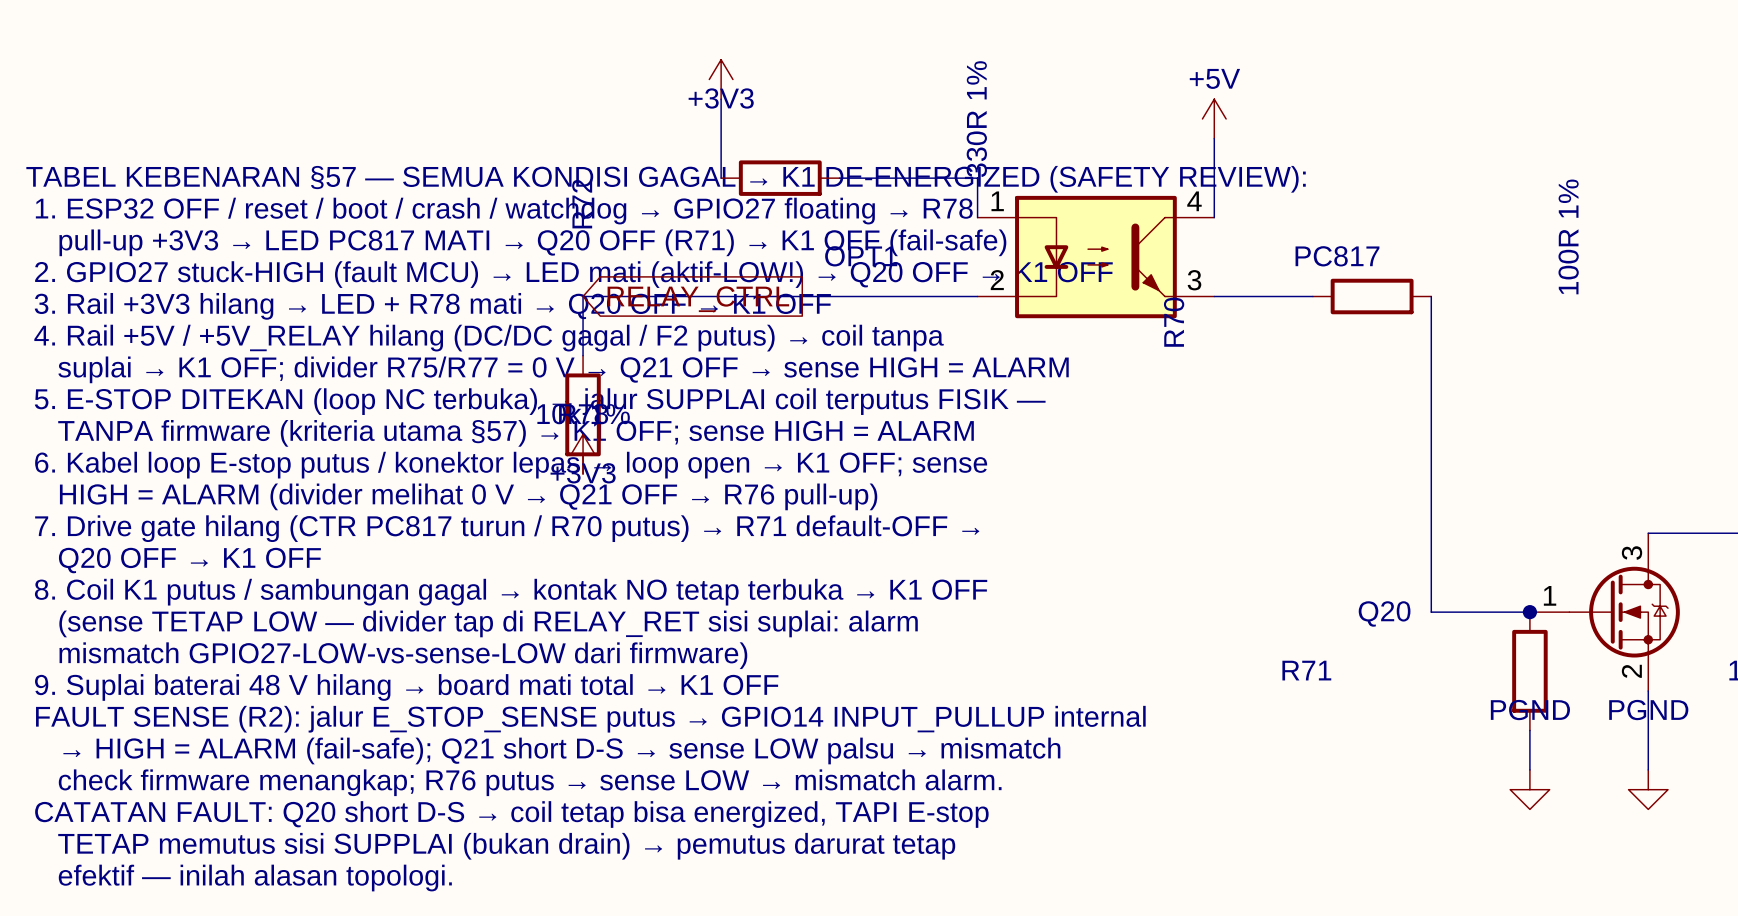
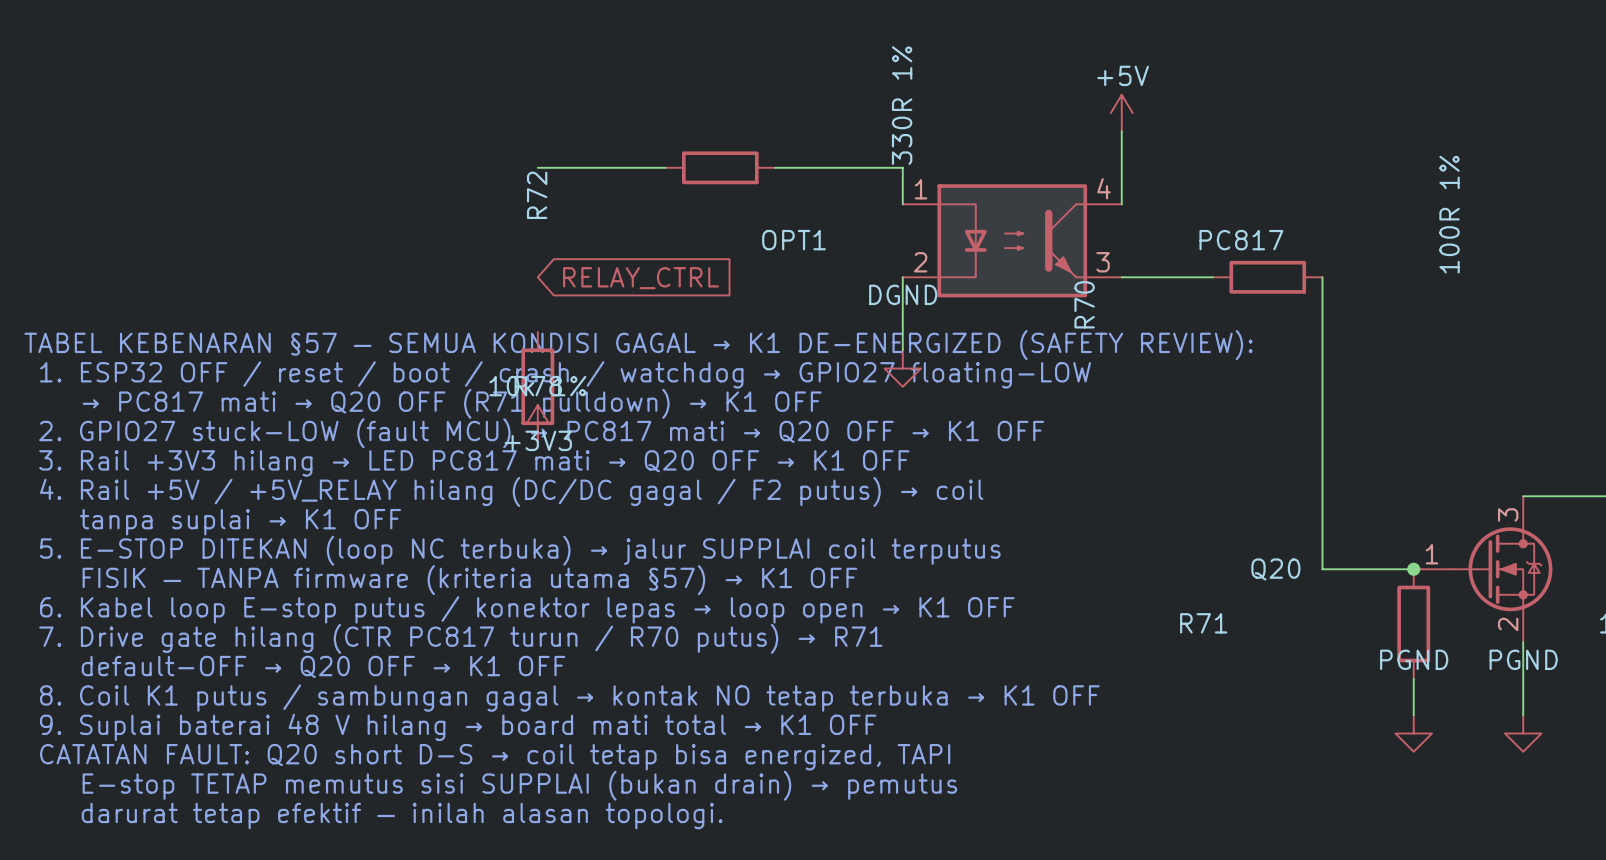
power symbol: +3V3 (721, 79) -> none
wire: (721, 99) (721, 178) -> (537, 167) (665, 167)
text: TABEL KEBENARAN §57 — SEMUA KONDISI GAGAL → K1 DE-ENERGIZED (SAFETY REVIEW): (666, 179) -> none
text: 1. ESP32 OFF / reset / boot / crash / watchdog → GPIO27 floating → R78 (504, 211) -> none
text: pull-up +3V3 → LED PC817 MATI → Q20 OFF (R71) → K1 OFF (fail-safe) (532, 242) -> none
text: 2. GPIO27 stuck-HIGH (fault MCU) → LED mati (aktif-LOW!) → Q20 OFF → K1 OFF (573, 274) -> none
wire: (977, 296) (583, 296) (583, 355) -> (902, 277) (902, 350)
text: 3. Rail +3V3 hilang → LED + R78 mati → Q20 OFF → K1 OFF (432, 306) -> none
text: 4. Rail +5V / +5V_RELAY hilang (DC/DC gagal / F2 putus) → coil tanpa (489, 338) -> none
text: suplai → K1 OFF; divider R75/R77 = 0 V → Q21 OFF → sense HIGH = ALARM (563, 369) -> TABEL KEBENARAN §57 — SEMUA KONDISI GAGAL → K1 DE-ENERGIZED (SAFETY REVIEW): (638, 345)
power symbol: none -> DGND (902, 368)
text: 5. E-STOP DITEKAN (loop NC terbuka) → jalur SUPPLAI coil terputus FISIK — (540, 401) -> 1. ESP32 OFF / reset / boot / crash / watchdog → GPIO27 floating-LOW (565, 374)
text: TANPA firmware (kriteria utama §57) → K1 OFF; sense HIGH = ALARM (516, 433) -> → PC817 mati → Q20 OFF (R71 pulldown) → K1 OFF (452, 403)
text: 6. Kabel loop E-stop putus / konektor lepas → loop open → K1 OFF; sense (511, 465) -> 2. GPIO27 stuck-LOW (fault MCU) → PC817 mati → Q20 OFF → K1 OFF (541, 433)
text: HIGH = ALARM (divider melihat 0 V → Q21 OFF → R76 pull-up) (468, 496) -> 3. Rail +3V3 hilang → LED PC817 mati → Q20 OFF → K1 OFF (474, 463)
text: 7. Drive gate hilang (CTR PC817 turun / R70 putus) → R71 default-OFF → (507, 528) -> 4. Rail +5V / +5V_RELAY hilang (DC/DC gagal / F2 putus) → coil (511, 491)
text: Q20 OFF → K1 OFF (189, 560) -> tanpa suplai → K1 OFF (240, 522)
text: 8. Coil K1 putus / sambungan gagal → kontak NO tetap terbuka → K1 OFF (511, 592) -> 5. E-STOP DITEKAN (loop NC terbuka) → jalur SUPPLAI coil terputus (520, 550)
text: (sense TETAP LOW — divider tap di RELAY_RET sisi suplai: alarm (488, 623) -> FISIK — TANPA firmware (kriteria utama §57) → K1 OFF (469, 580)
text: mismatch GPIO27-LOW-vs-sense-LOW dari firmware) (403, 655) -> 6. Kabel loop E-stop putus / konektor lepas → loop open → K1 OFF (527, 609)
text: 9. Suplai baterai 48 V hilang → board mati total → K1 OFF (406, 687) -> 7. Drive gate hilang (CTR PC817 turun / R70 putus) → R71 (460, 638)
text: FAULT SENSE (R2): jalur E_STOP_SENSE putus → GPIO14 INPUT_PULLUP internal (590, 719) -> default-OFF → Q20 OFF → K1 OFF (323, 666)
text: → HIGH = ALARM (fail-safe); Q21 short D-S → sense LOW palsu → mismatch (561, 750) -> 8. Coil K1 putus / sambungan gagal → kontak NO tetap terbuka → K1 OFF (569, 698)
text: check firmware menangkap; R76 putus → sense LOW → mismatch alarm. (530, 782) -> 9. Suplai baterai 48 V hilang → board mati total → K1 OFF (458, 727)
text: CATATAN FAULT: Q20 short D-S → coil tetap bisa energized, TAPI E-stop (511, 814) -> CATATAN FAULT: Q20 short D-S → coil tetap bisa energized, TAPI (495, 757)
text: TETAP memutus sisi SUPPLAI (bukan drain) → pemutus darurat tetap (506, 846) -> E-stop TETAP memutus sisi SUPPLAI (bukan drain) → pemutus (519, 785)
text: efektif — inilah alasan topologi. (255, 878) -> darurat tetap efektif — inilah alasan topologi. (402, 815)

